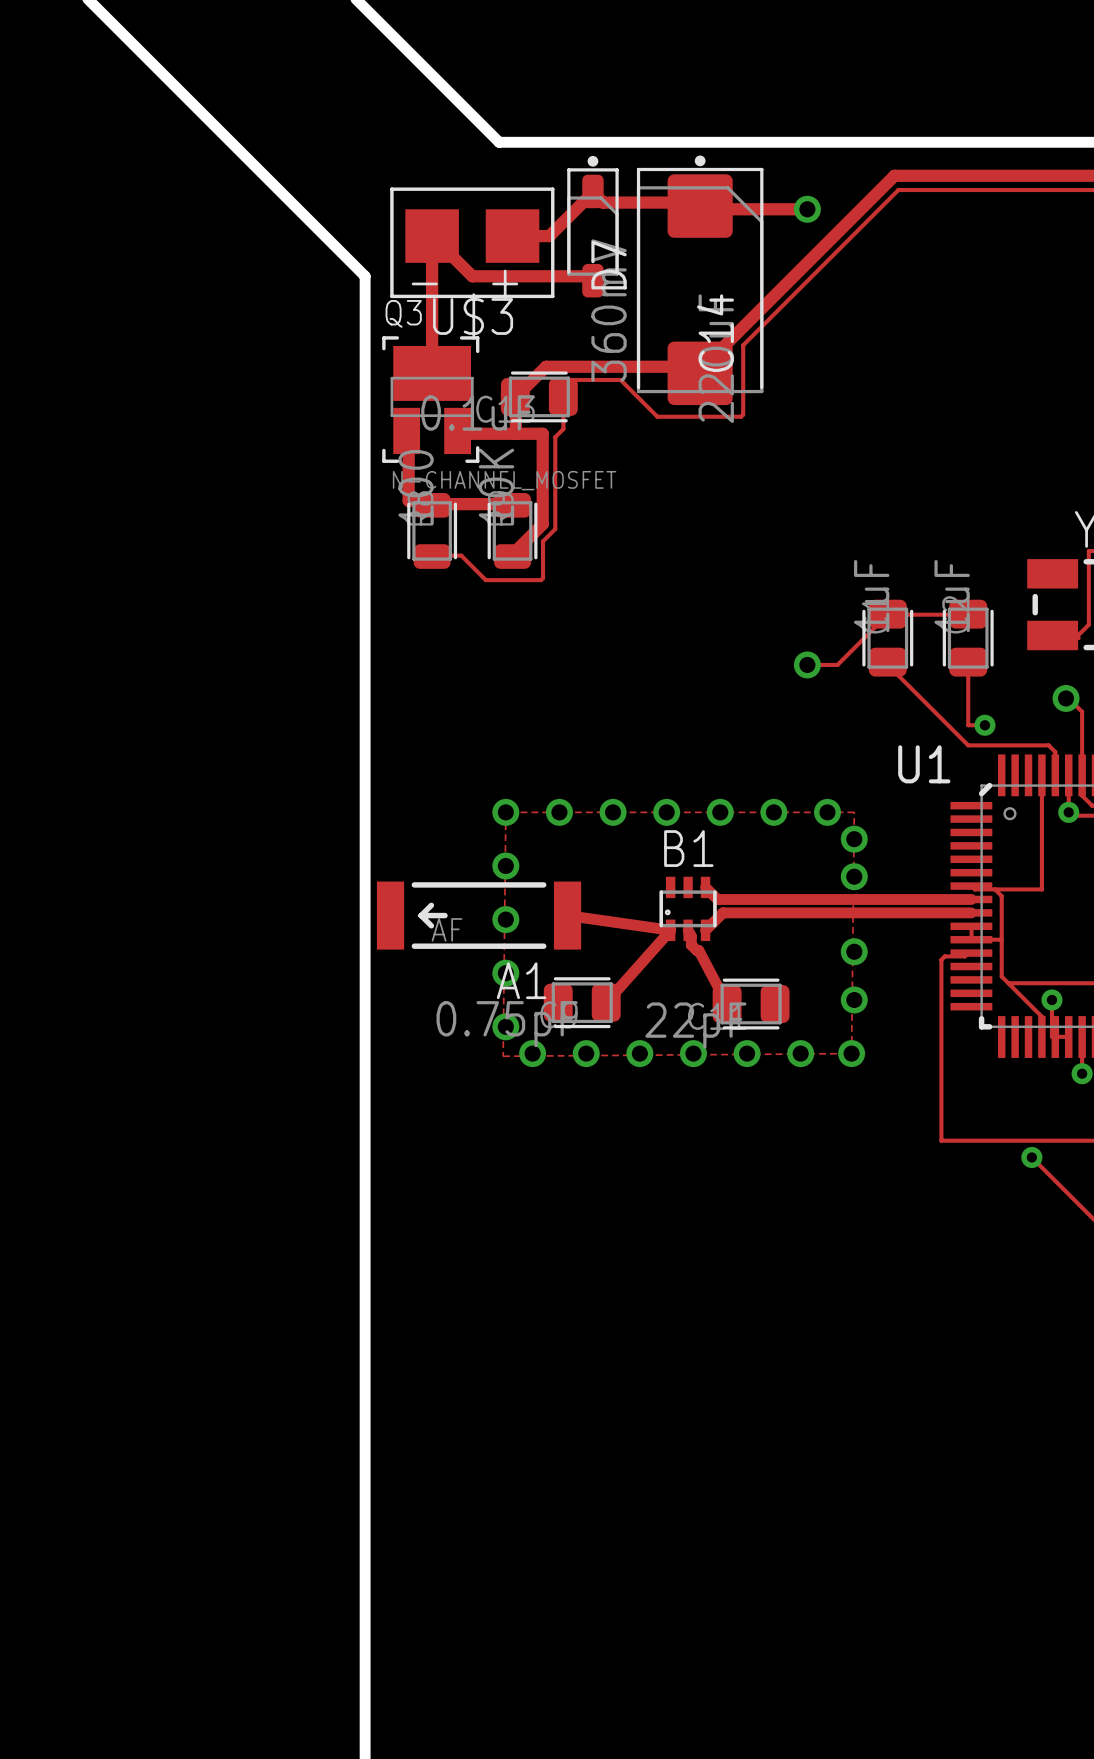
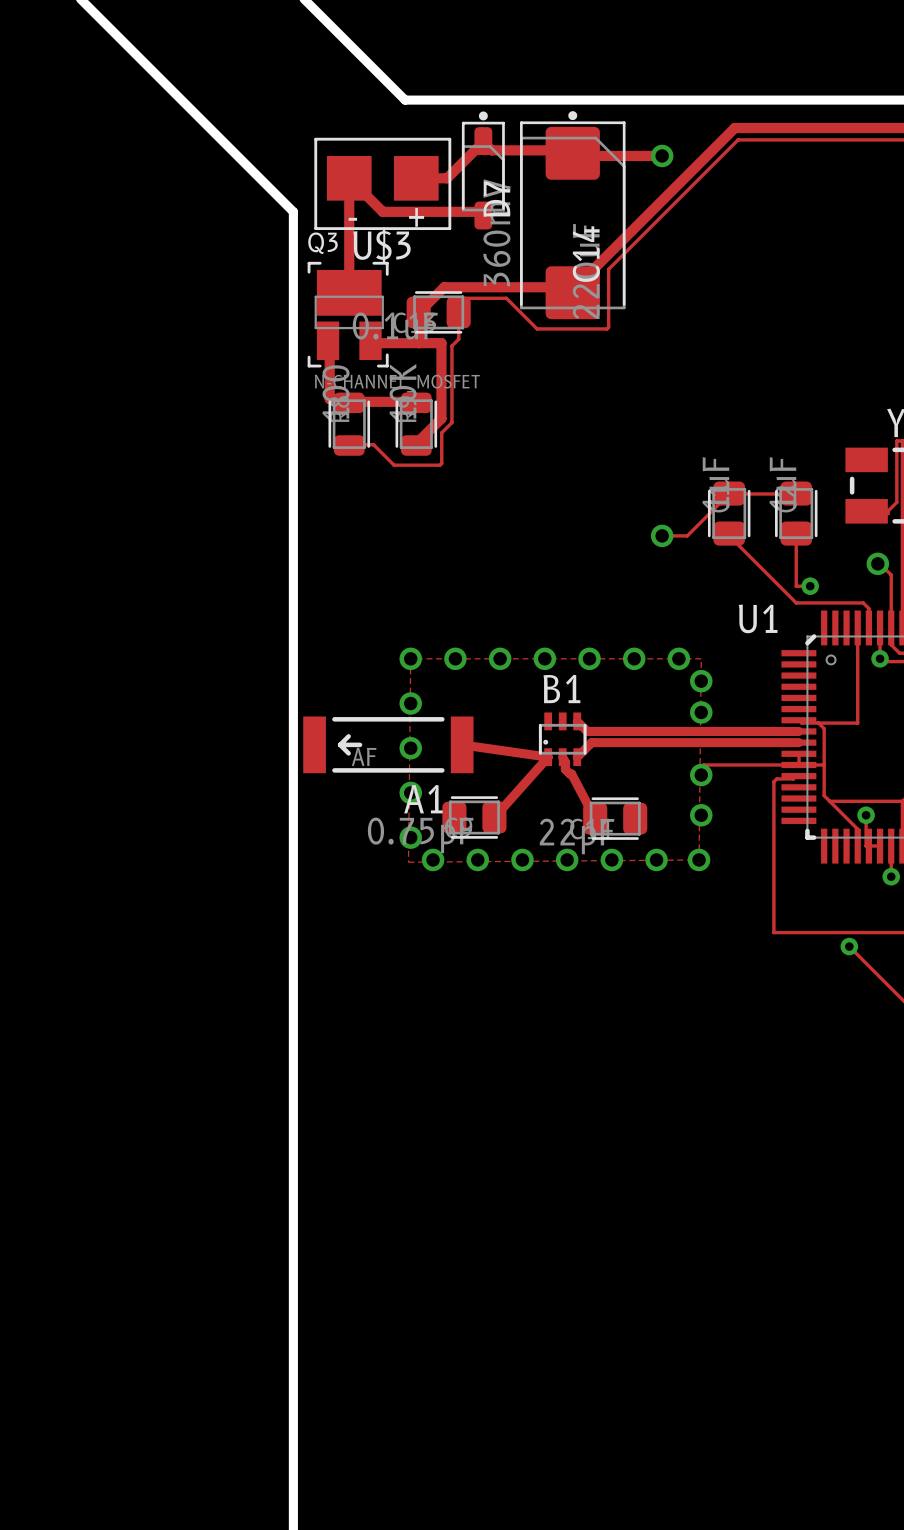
track: none -> (798, 764) (704, 764) (701, 775)

